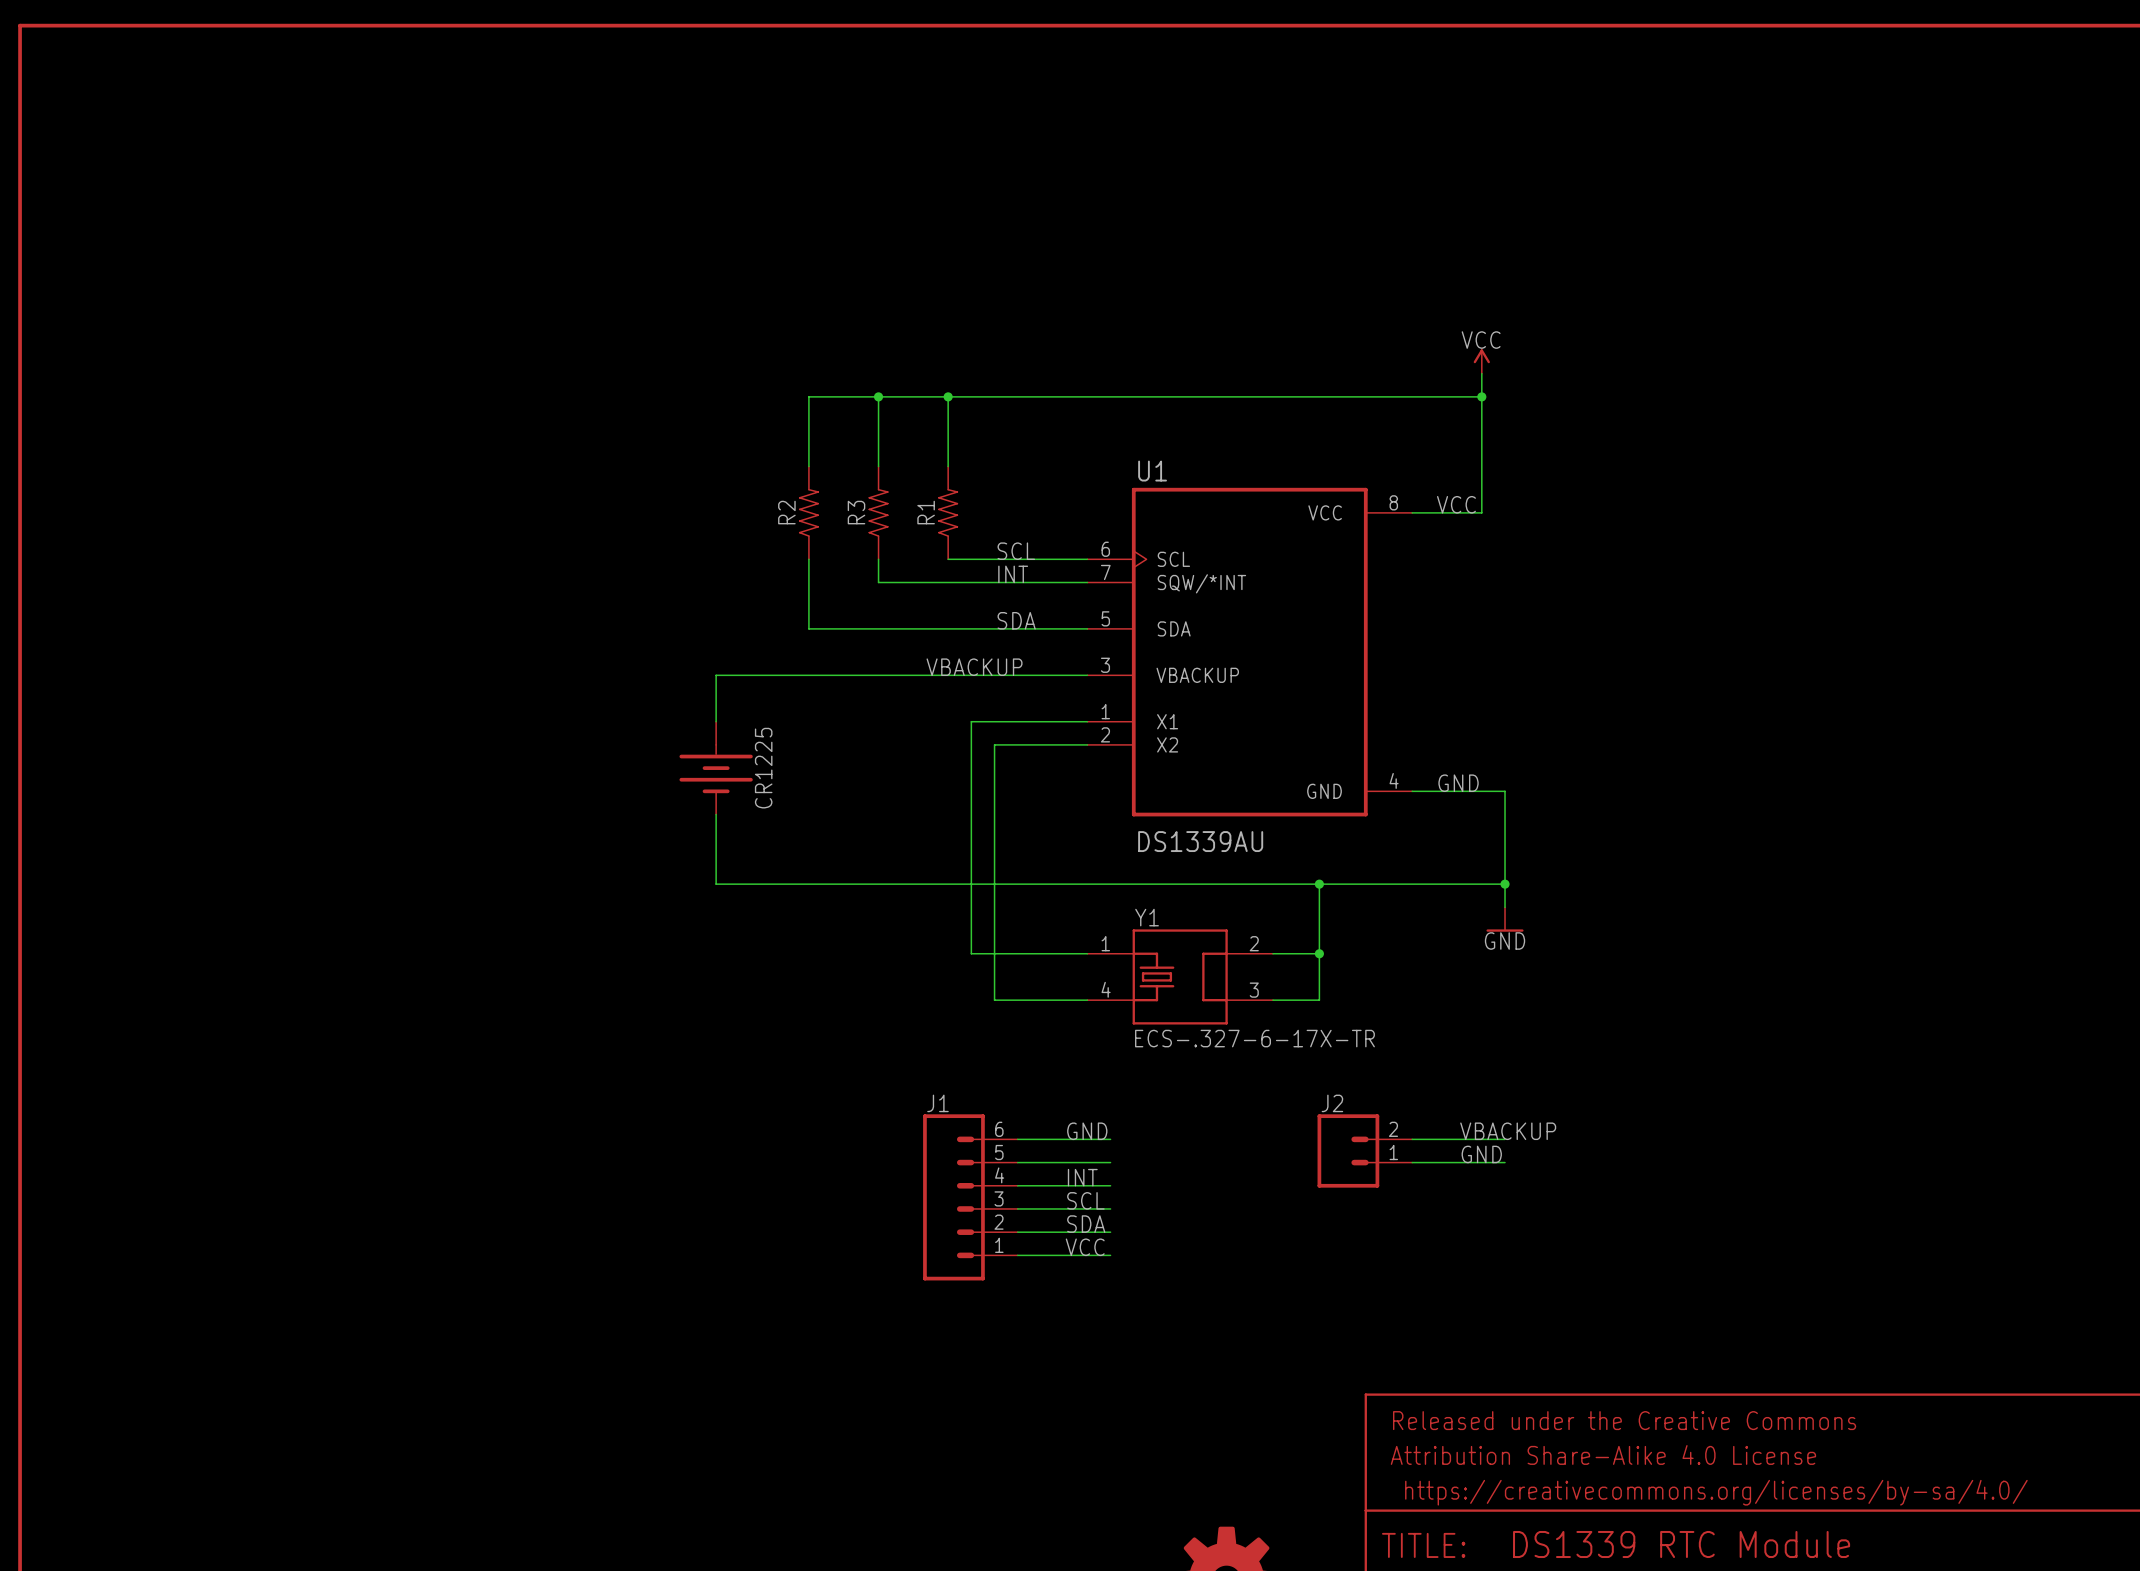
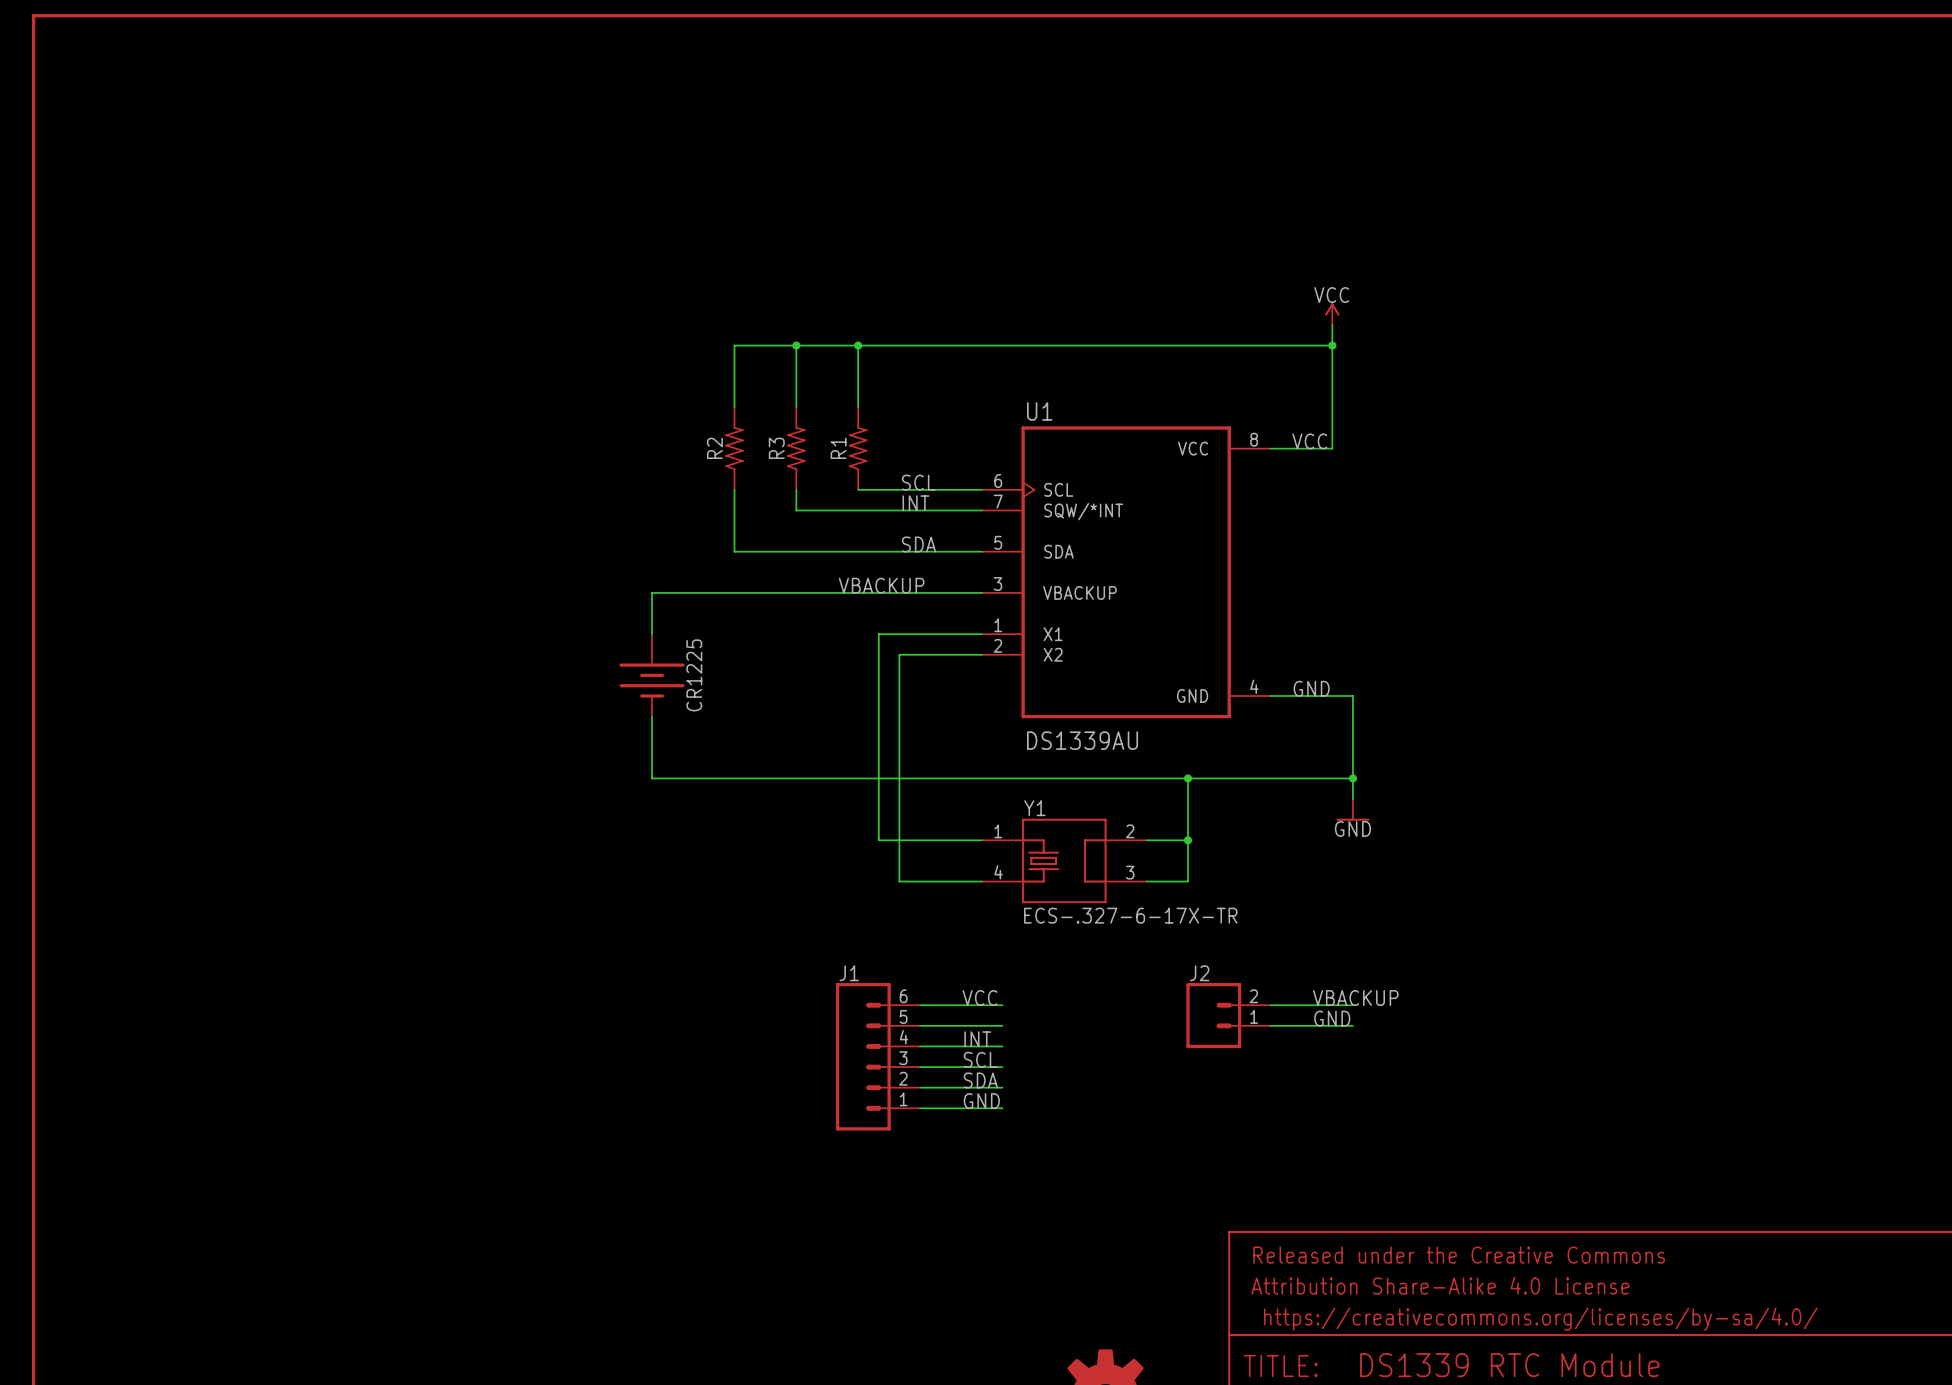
label: GND (1087, 1131) -> VCC (979, 998)
label: VCC (1085, 1247) -> GND (981, 1101)

